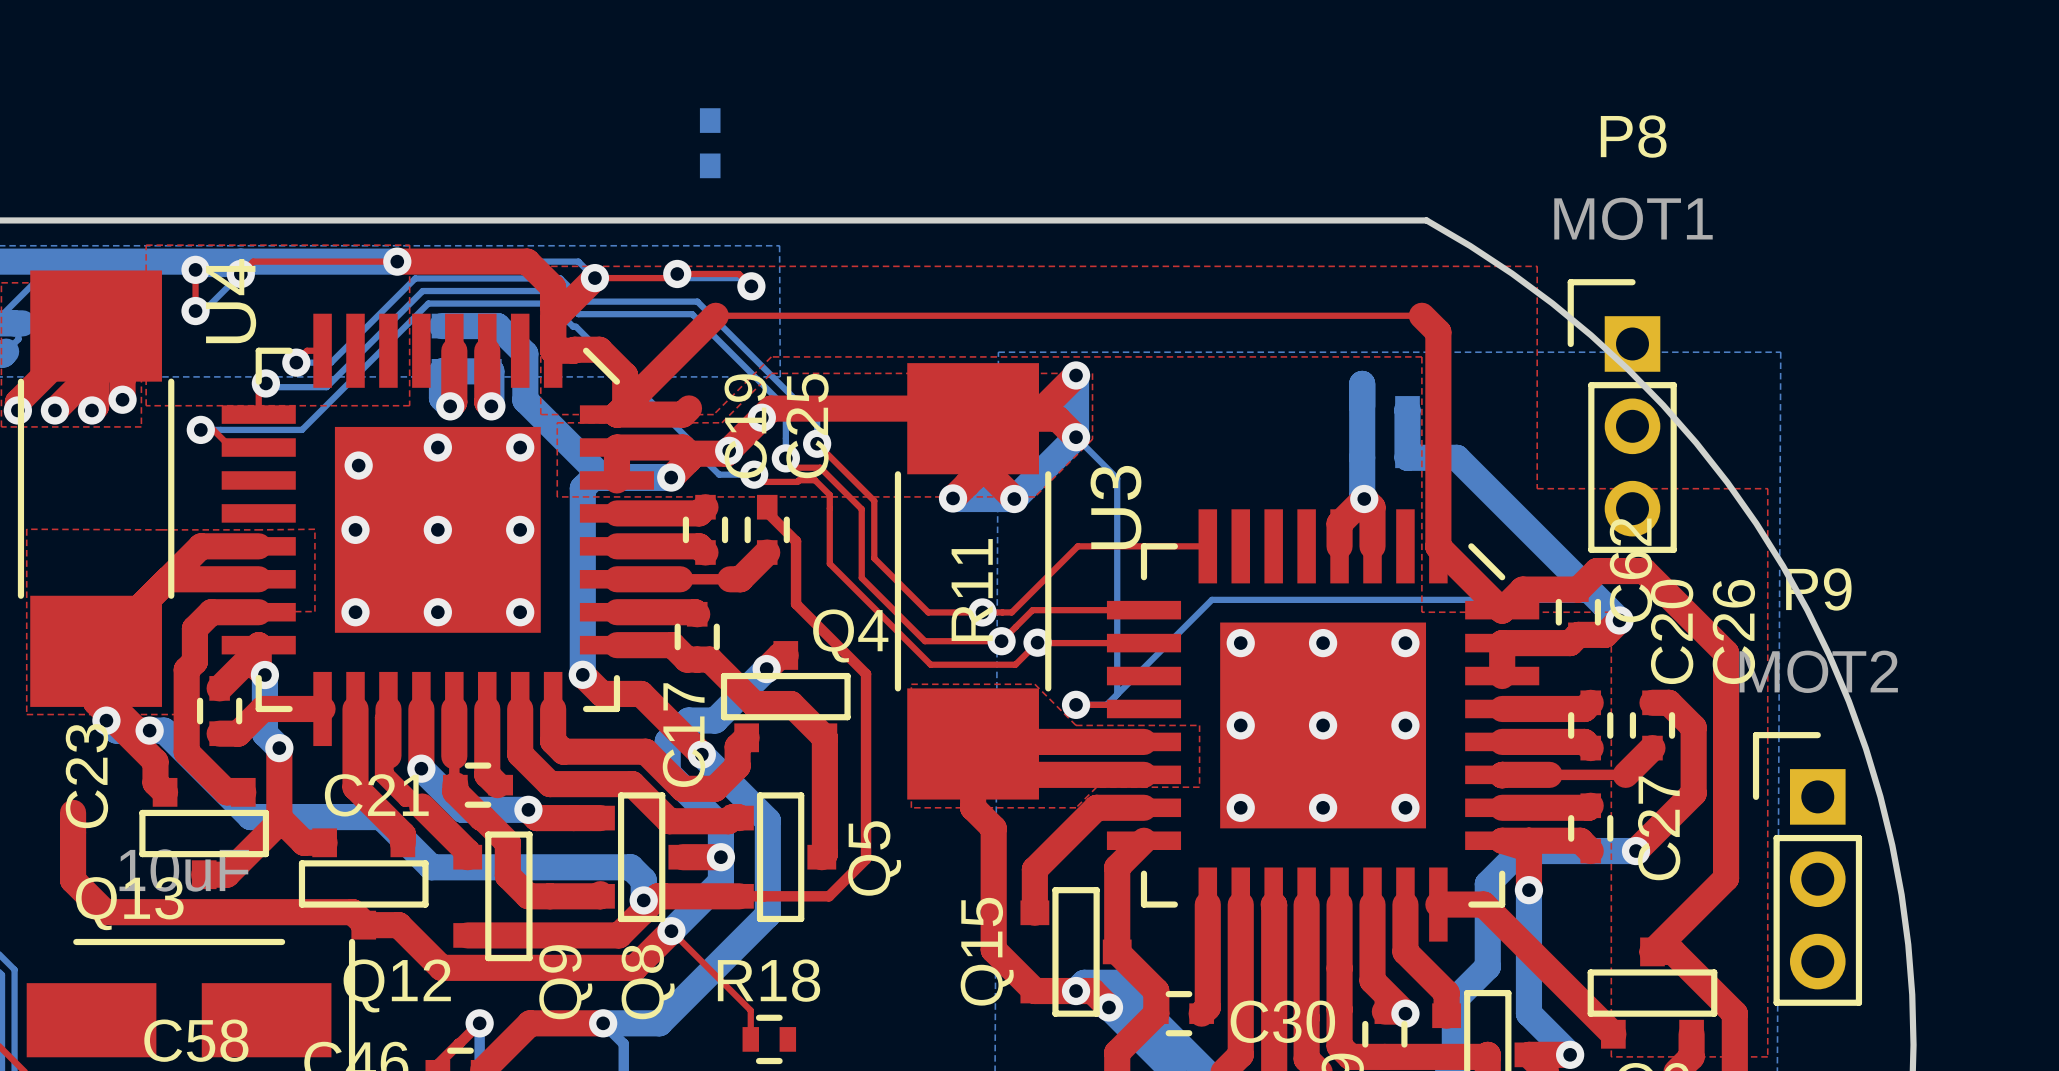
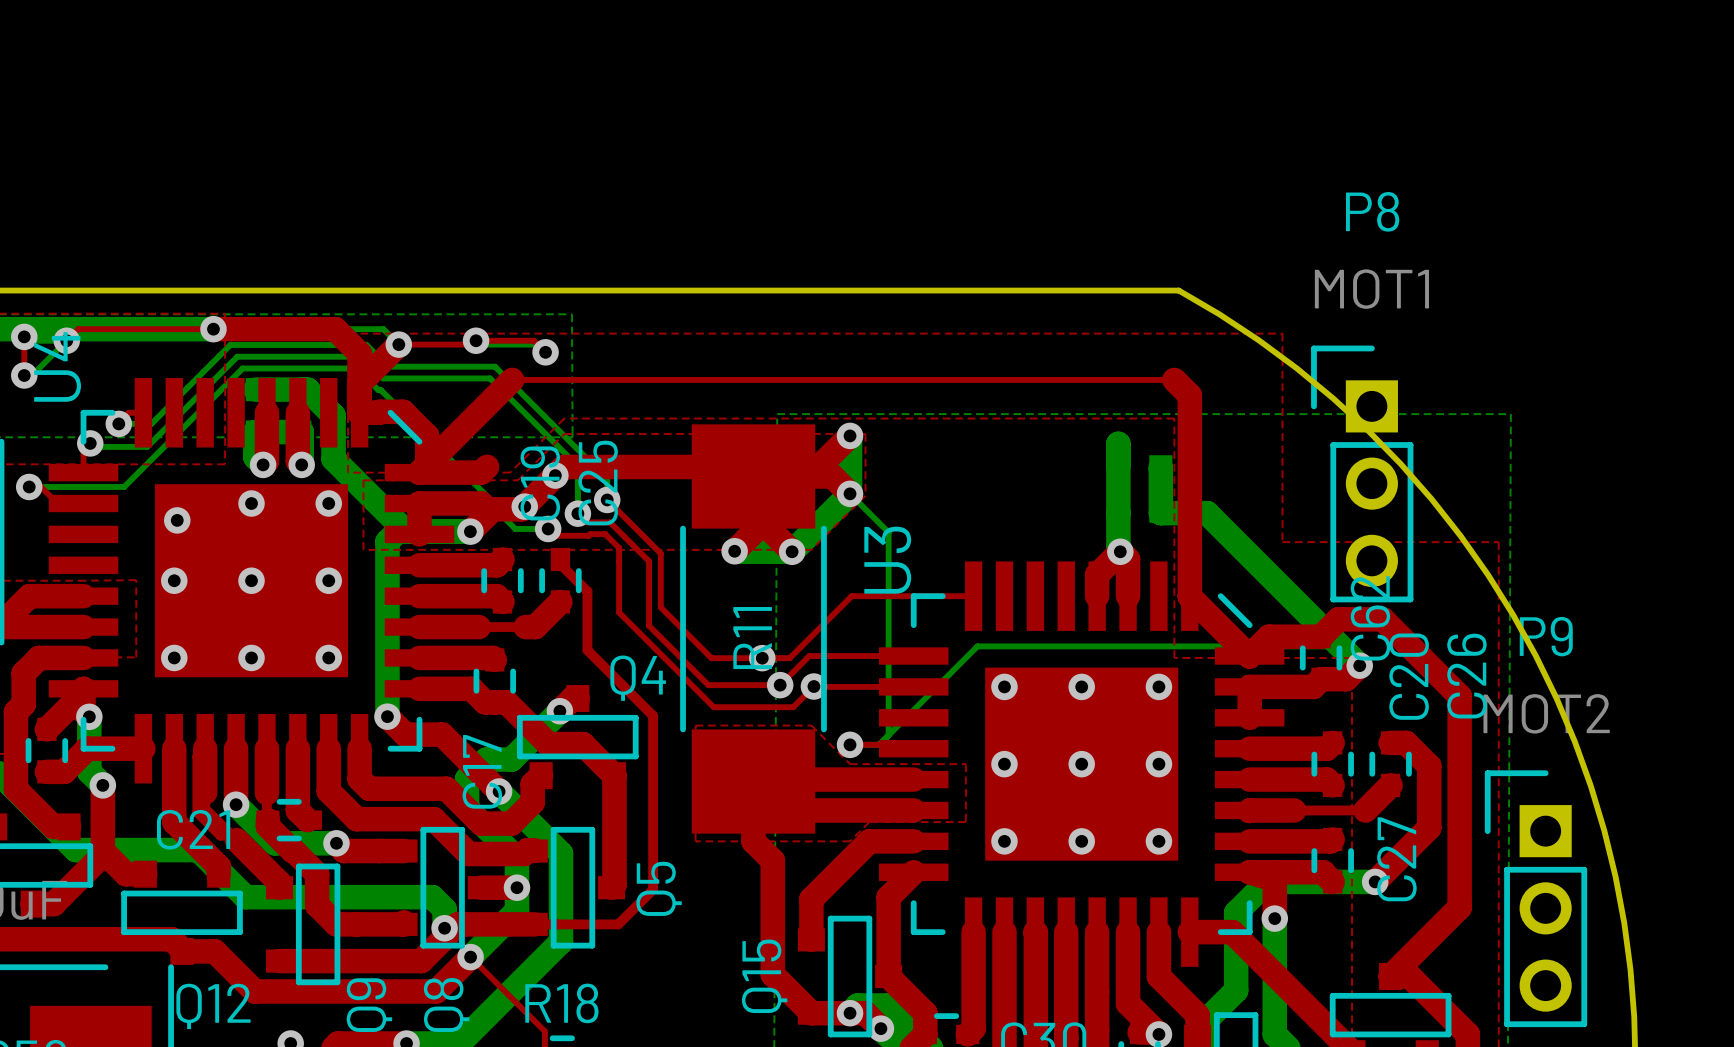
part: (710, 143) -> none

